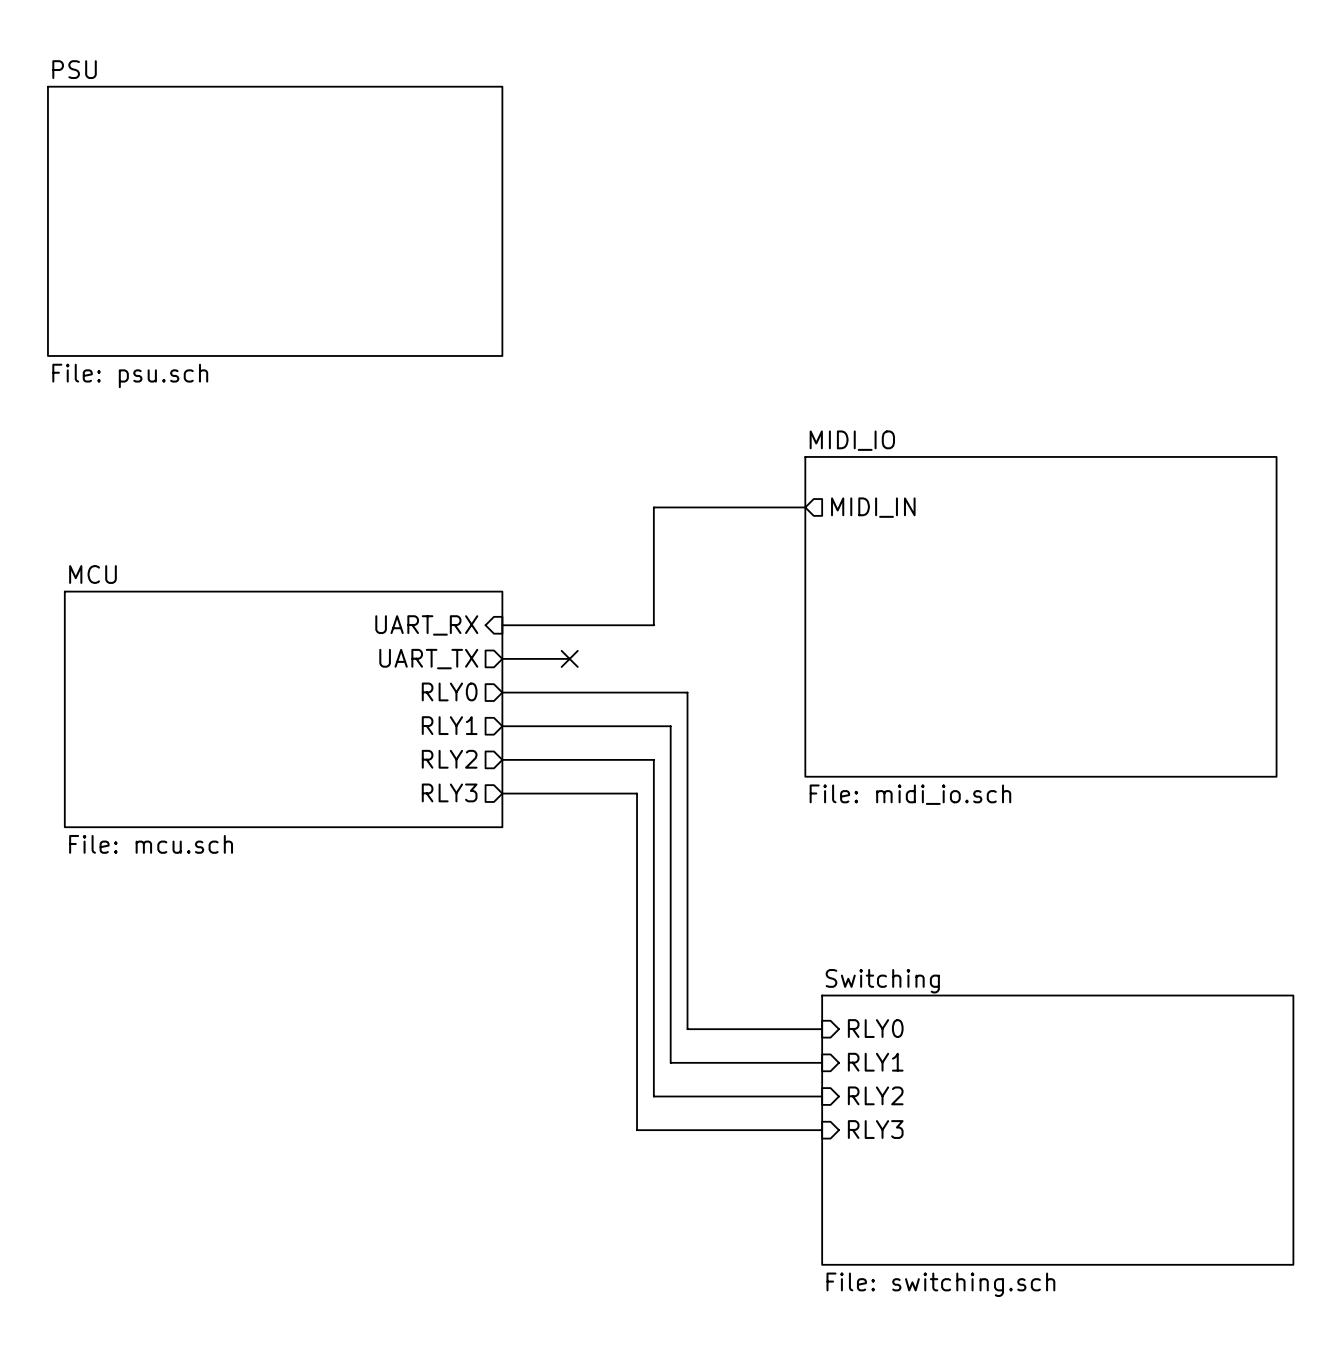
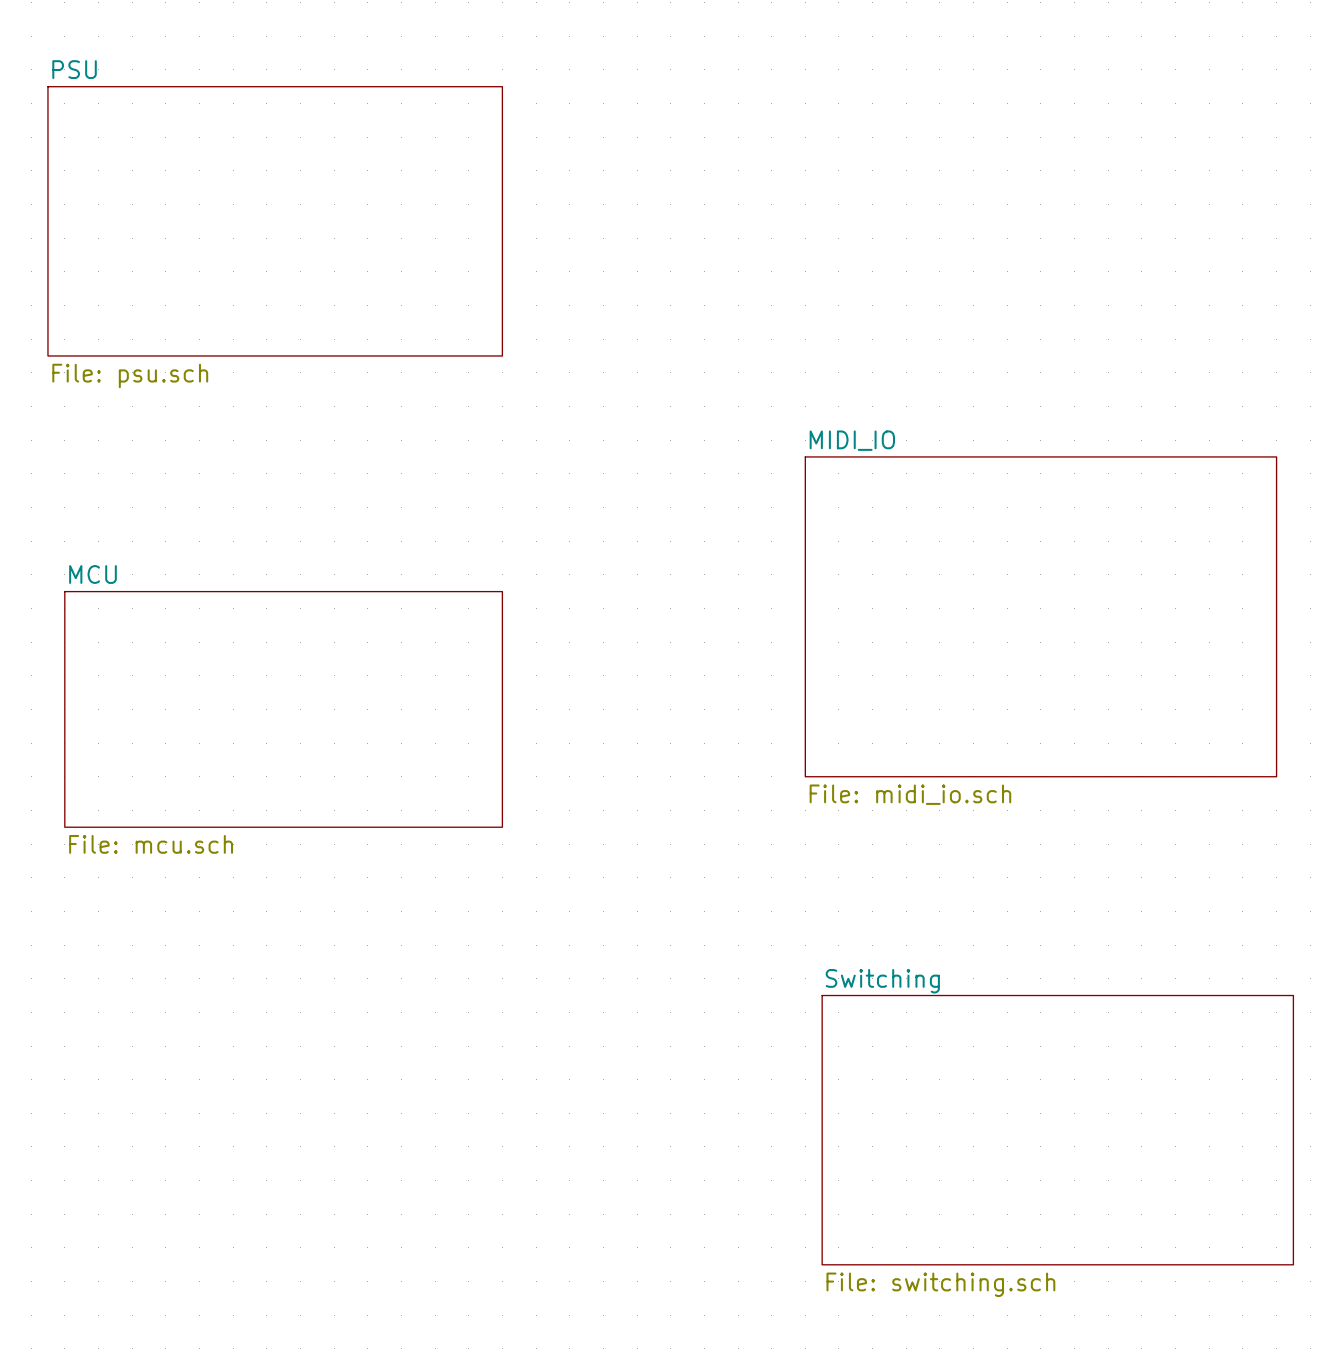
wire: (805, 507) (653, 507) (653, 625) (502, 625) -> none
sheet pin: MIDI_IN (873, 507) -> none
sheet pin: UART_RX (426, 625) -> none
wire: (502, 658) (569, 658) -> none
no-connect mark: (569, 658) -> none
sheet pin: UART_TX (428, 659) -> none
sheet pin: RLY0 (449, 691) -> none
wire: (502, 692) (687, 692) (687, 1029) (822, 1029) -> none
sheet pin: RLY1 (449, 725) -> none
wire: (502, 726) (670, 726) (670, 1062) (822, 1062) -> none
sheet pin: RLY2 (449, 759) -> none
wire: (502, 759) (653, 759) (653, 1096) (822, 1096) -> none
sheet pin: RLY3 (449, 792) -> none
wire: (502, 793) (637, 793) (637, 1130) (822, 1130) -> none
sheet pin: RLY0 (875, 1028) -> none
sheet pin: RLY1 (875, 1062) -> none
sheet pin: RLY2 (875, 1095) -> none
sheet pin: RLY3 (875, 1129) -> none

